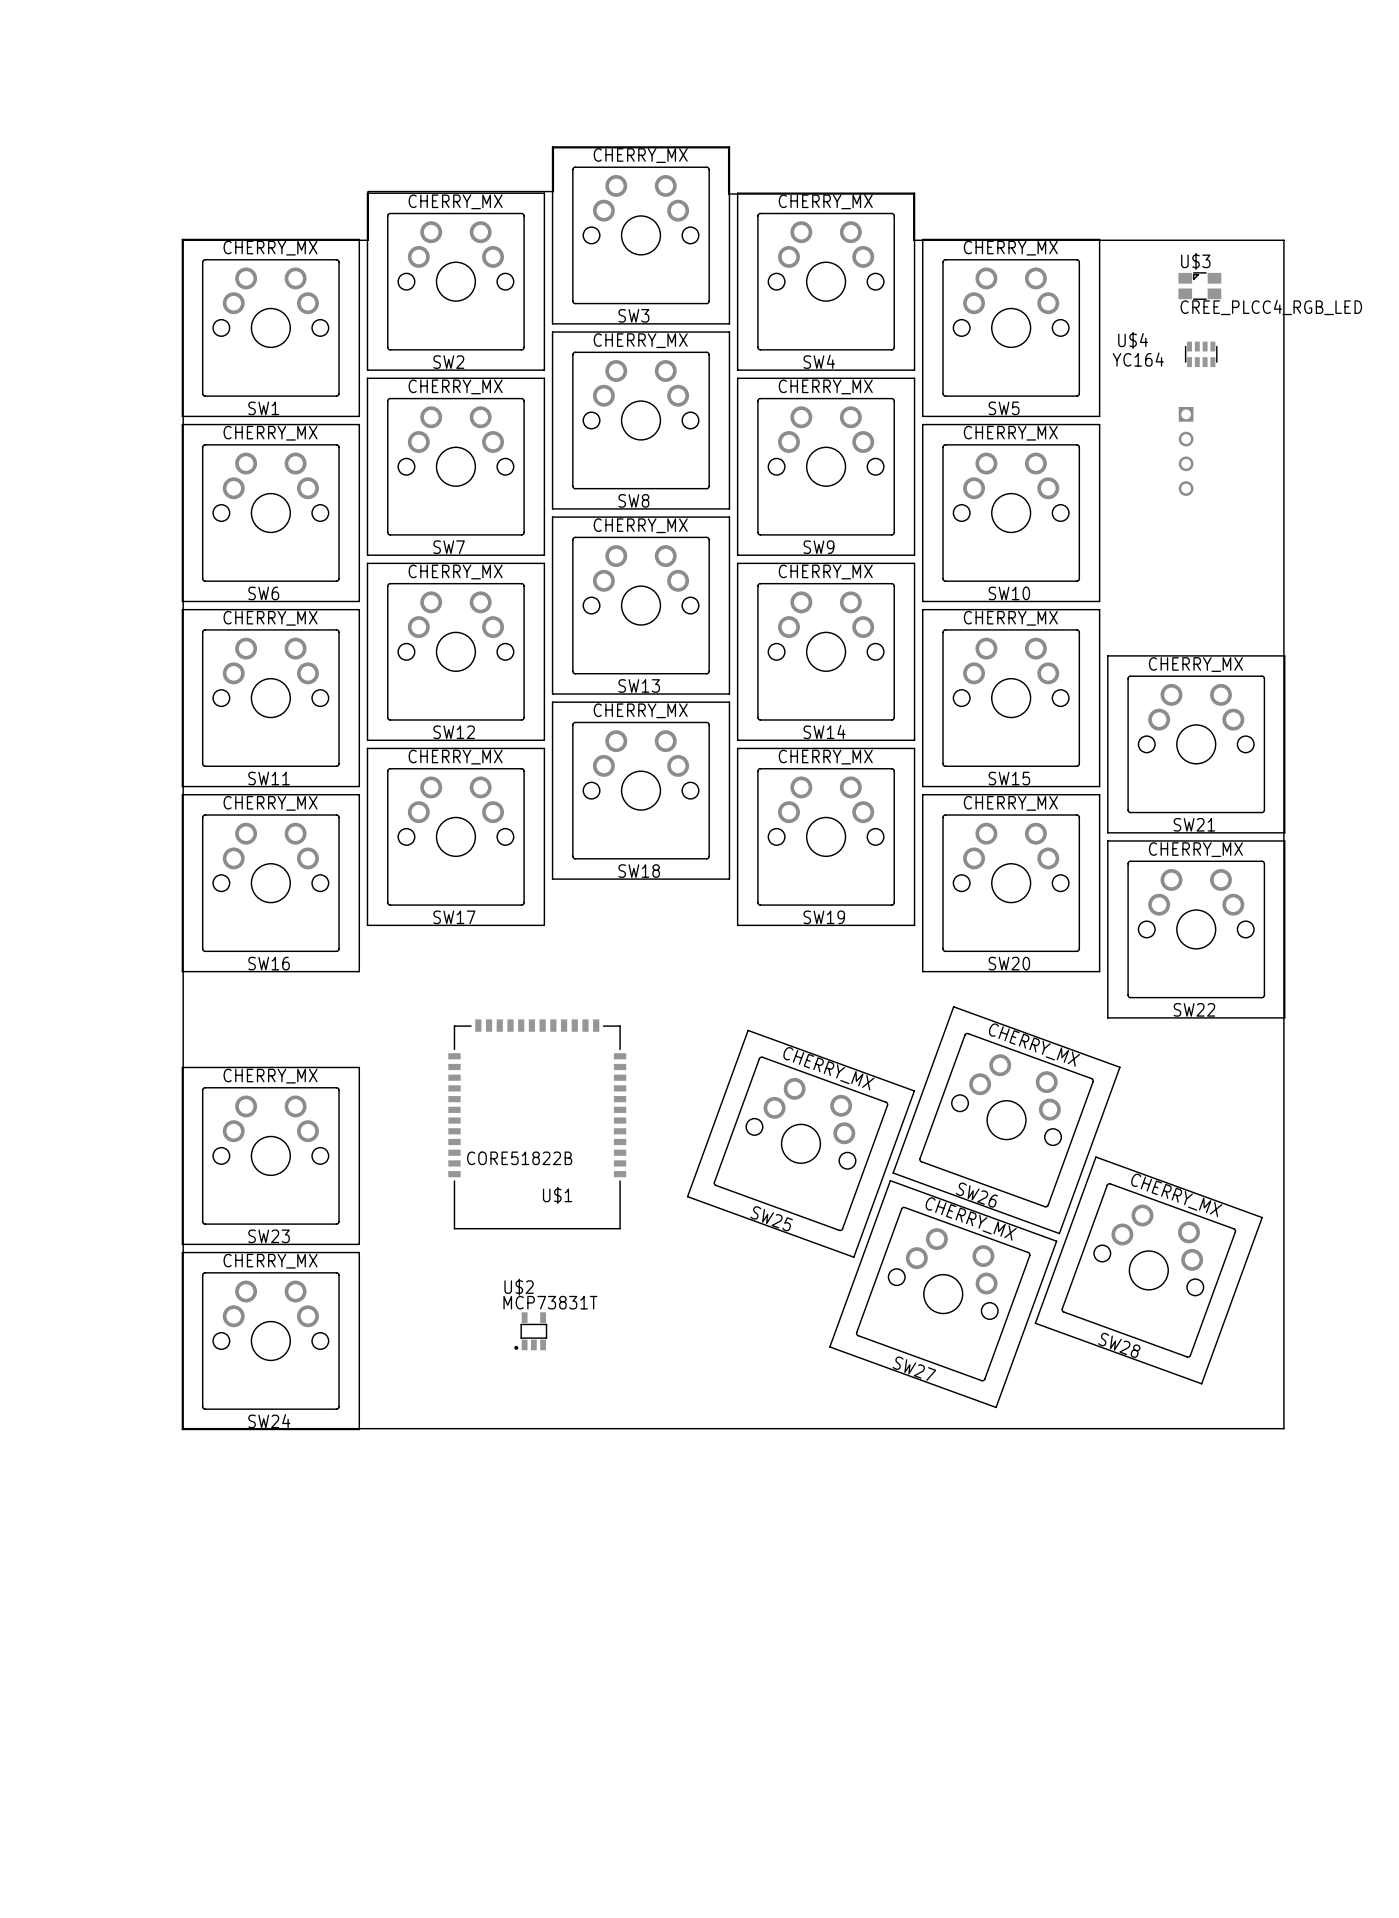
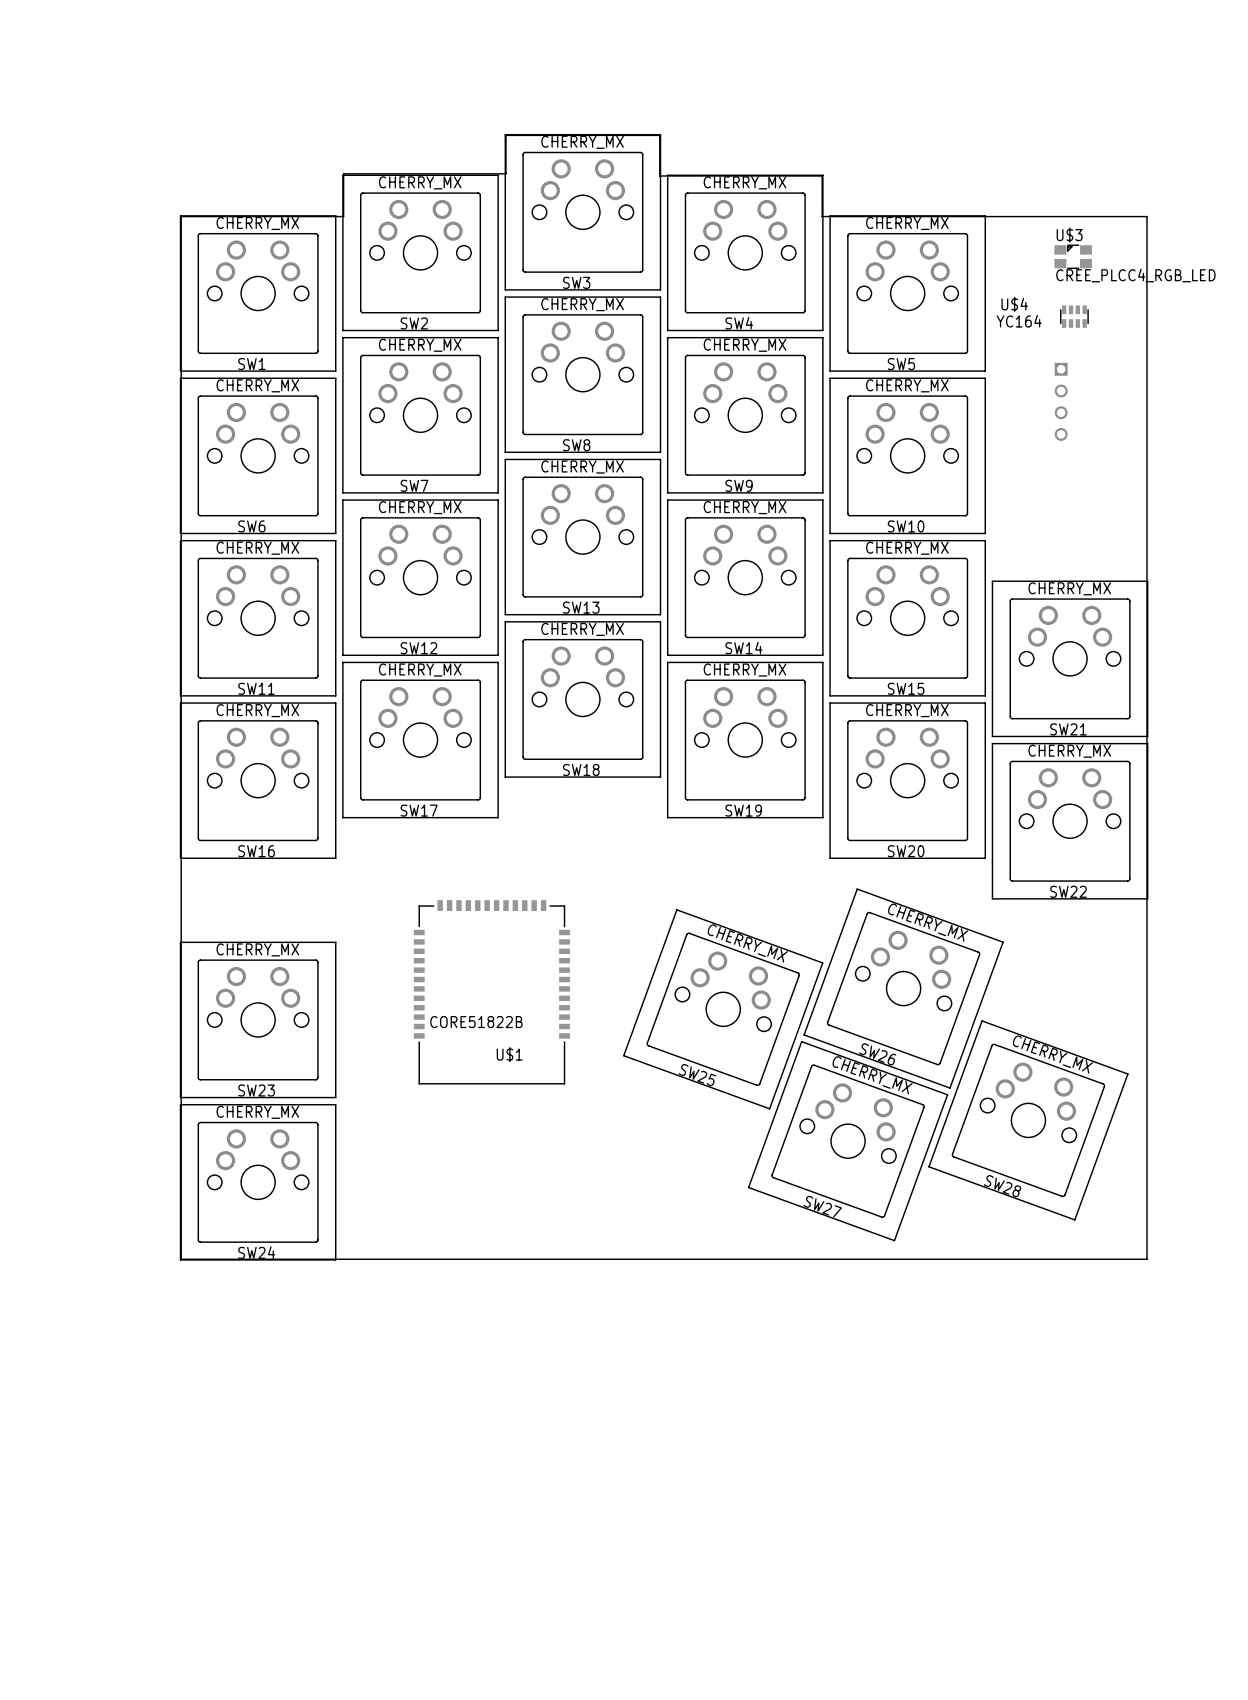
U$2: MCP73831T (530, 1331) -> none

